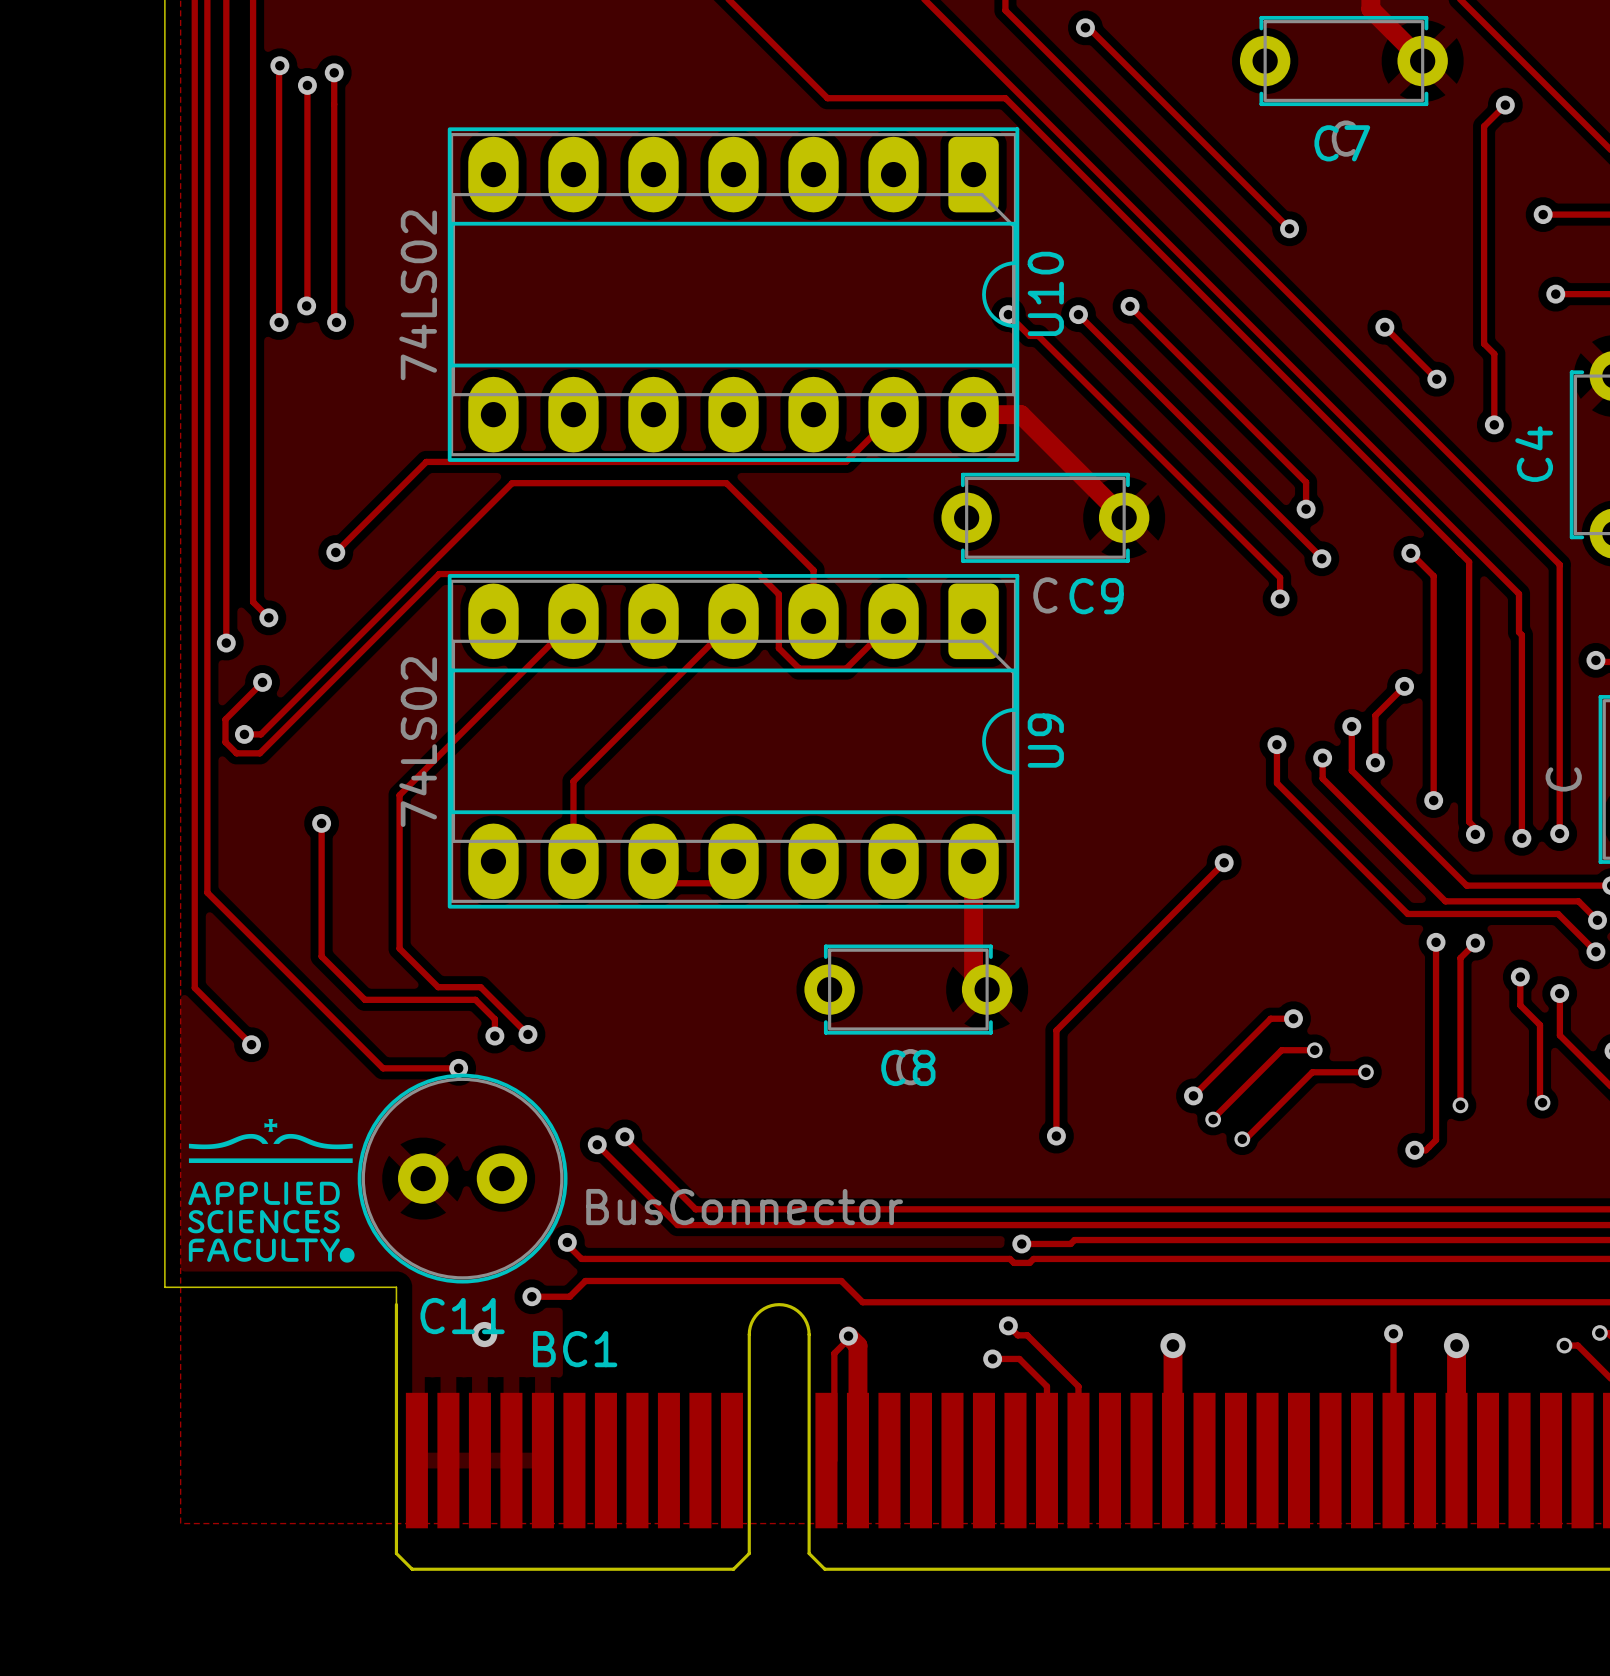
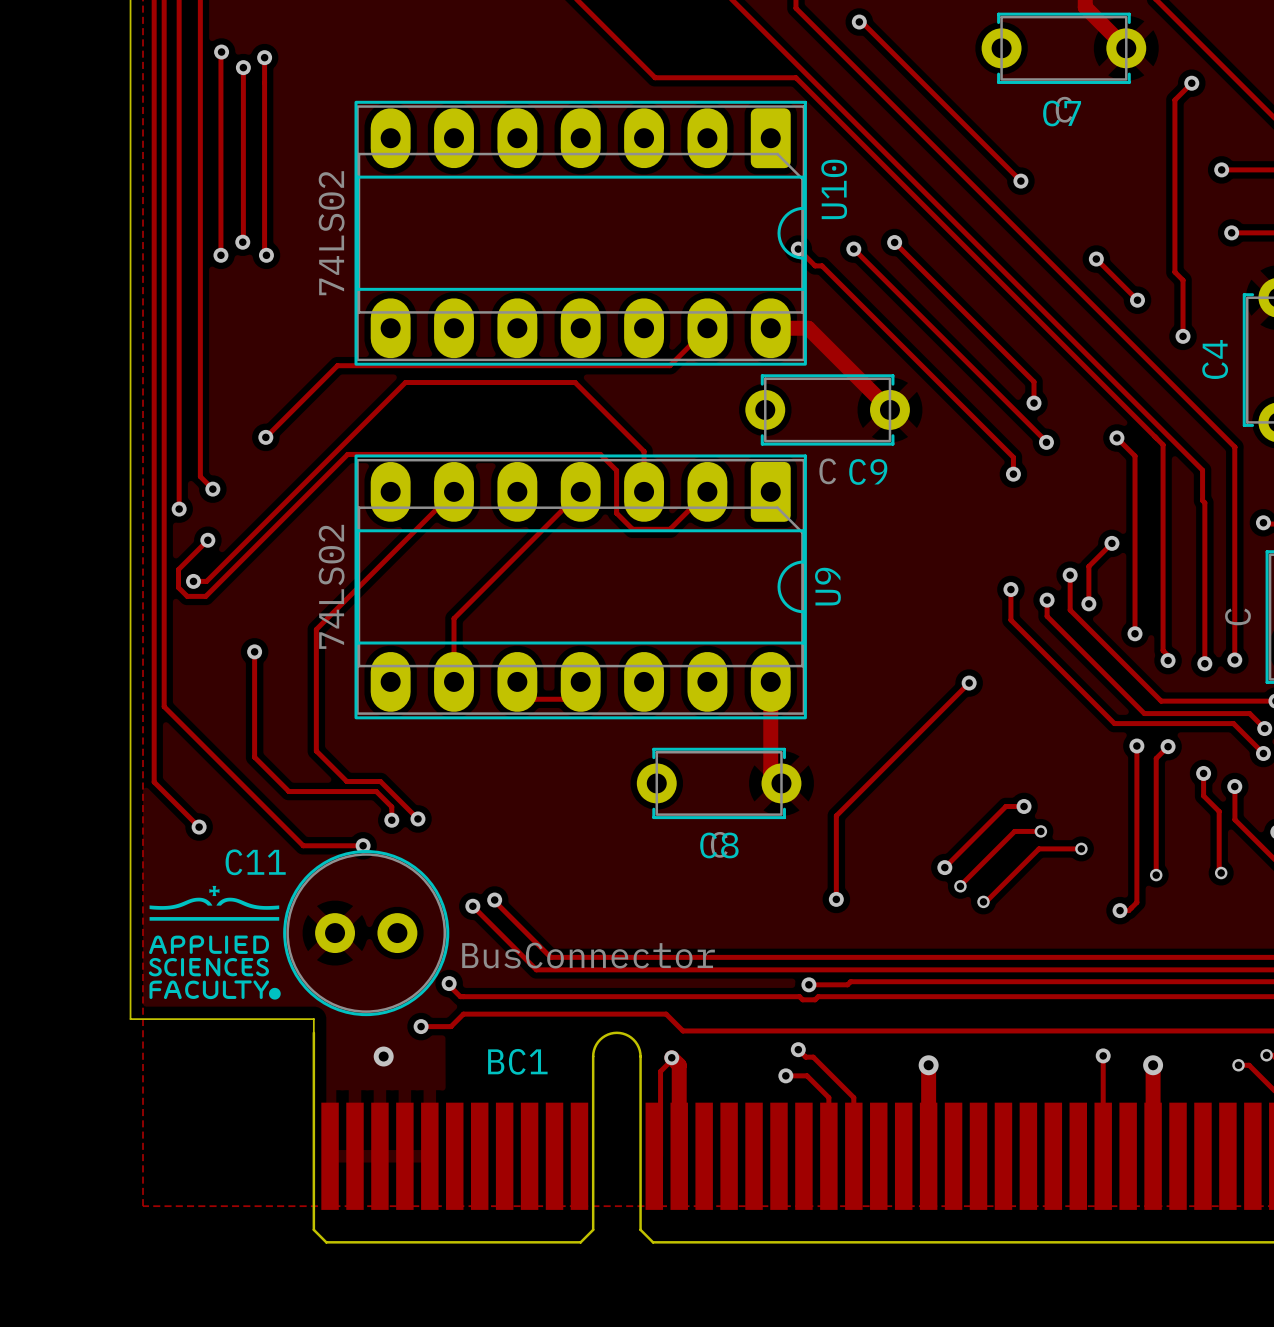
U10 name position: U10 (1045, 293) -> U10 (834, 189)
C11 name position: C11 (462, 1316) -> C11 (255, 862)
BC1 name position: BC1 (575, 1349) -> BC1 (517, 1061)

